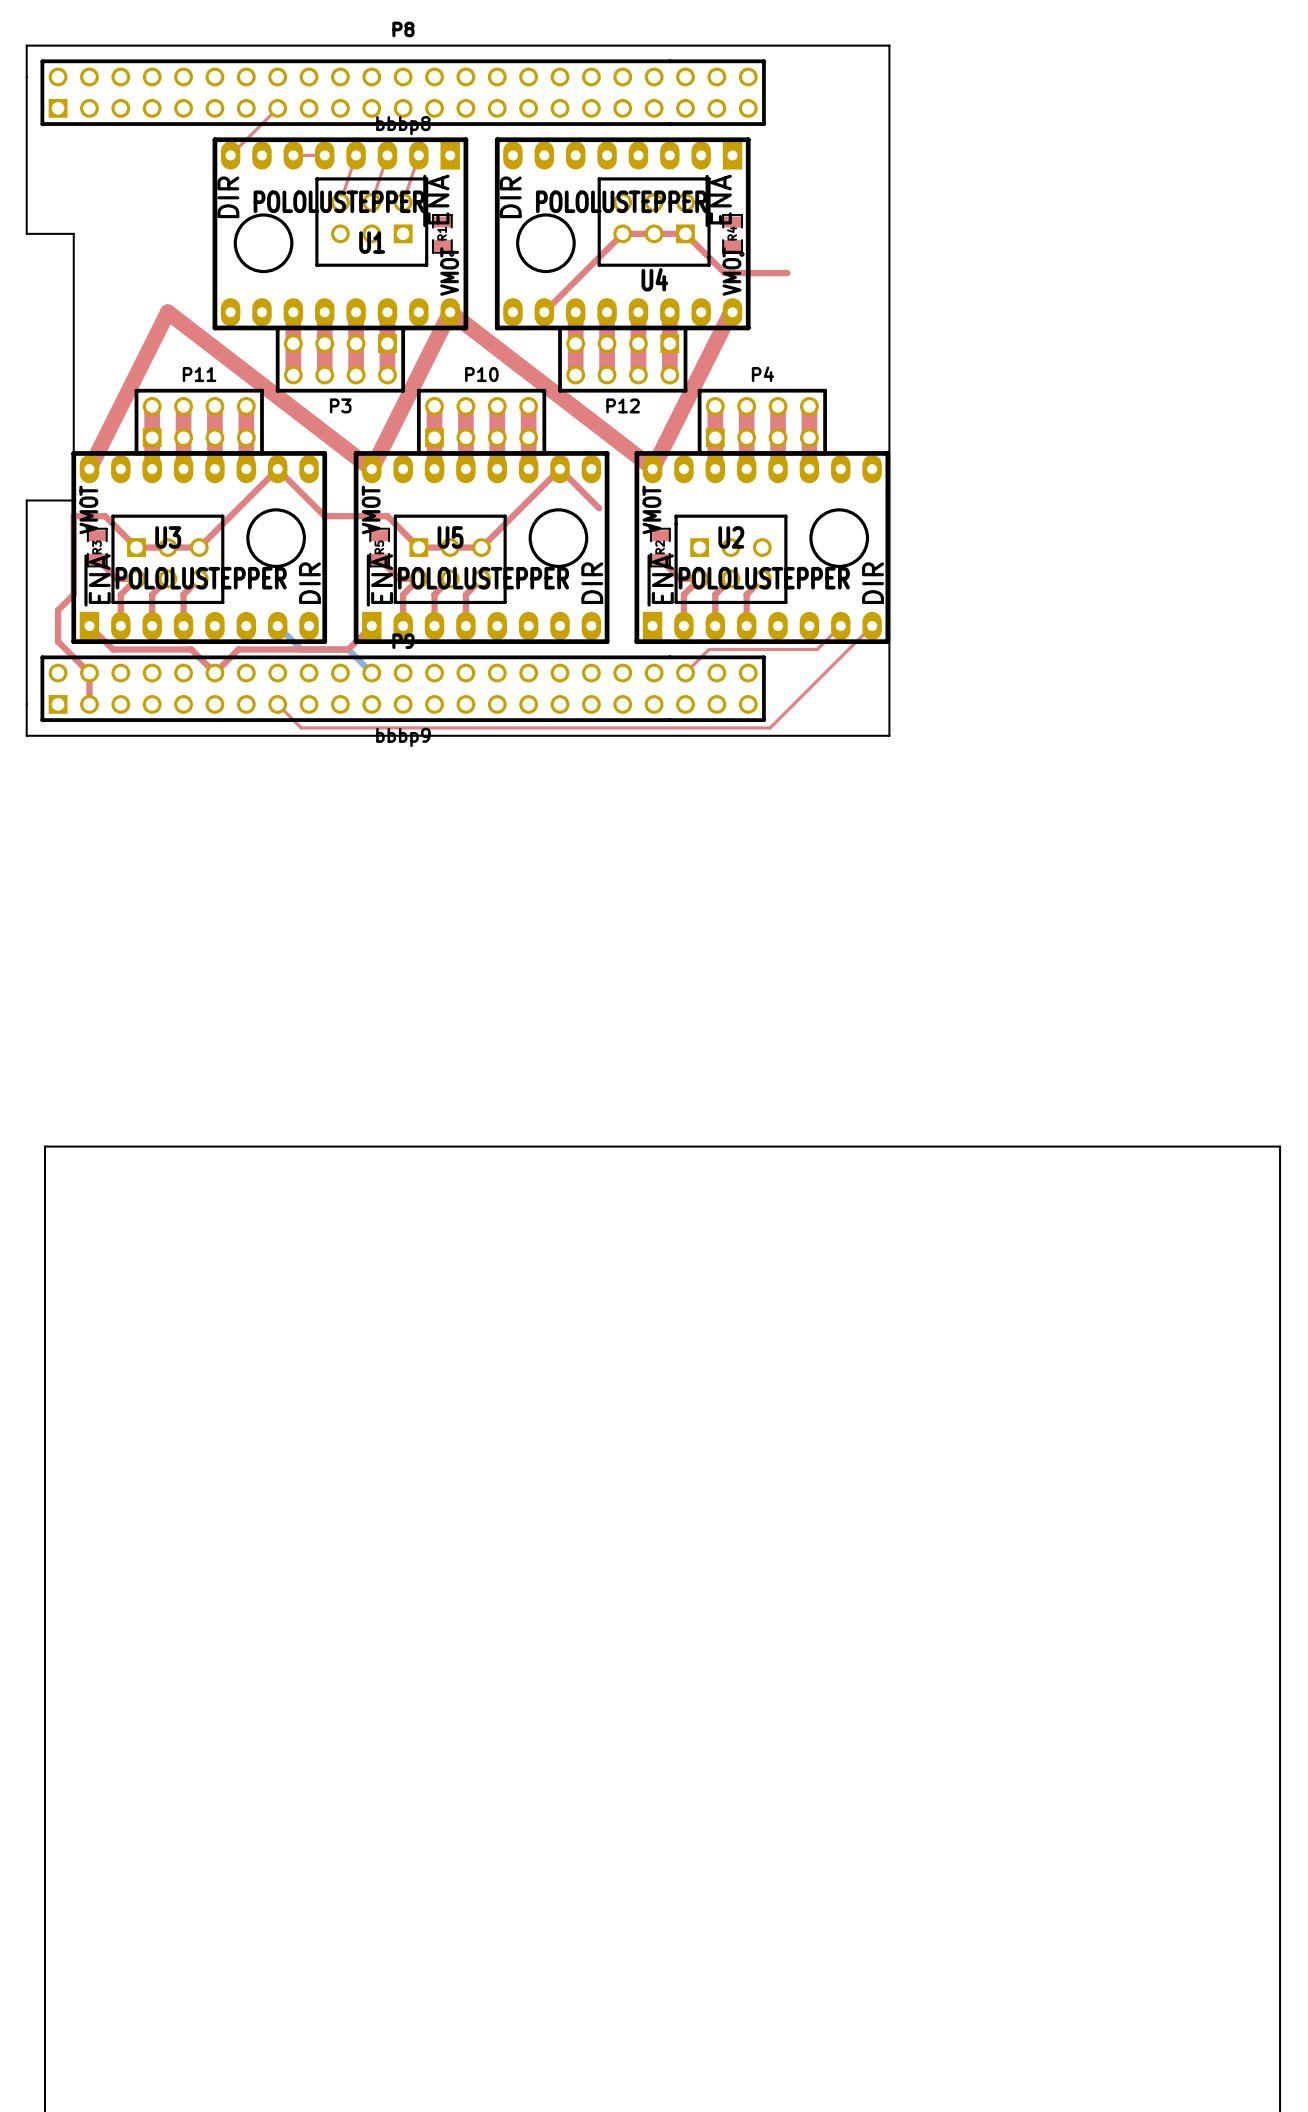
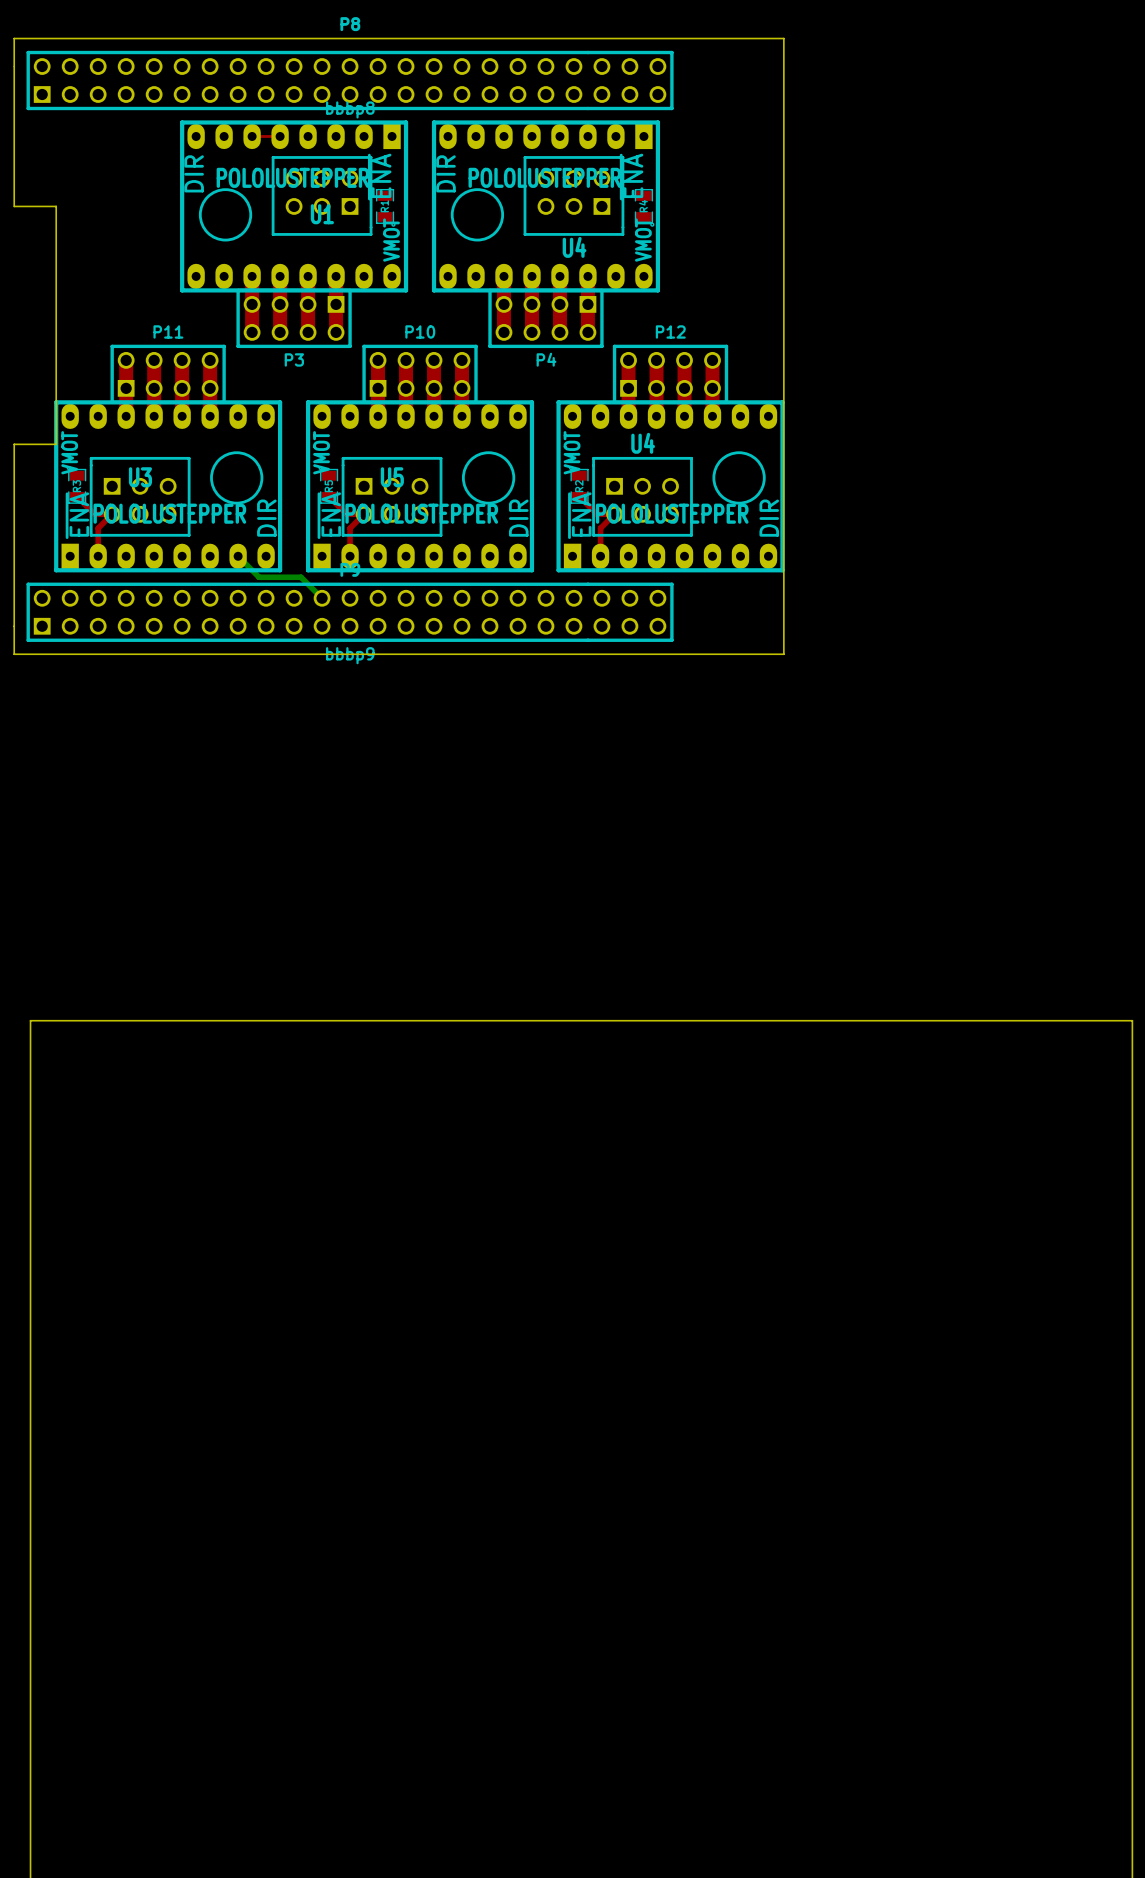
top track: (277, 108) (230, 155) -> none
top track: (356, 155) (340, 202) -> none
top track: (387, 155) (371, 202) -> none
top track: (418, 155) (403, 202) -> none
top track: (787, 273) (724, 273) (685, 233) (622, 233) (544, 312) -> none
top track: (730, 312) (652, 469) -> none
P4 name: P4 (762, 374) -> P12 (670, 331)
P12 name: P12 (623, 405) -> P4 (546, 359)
top track: (89, 469) (167, 312) (371, 469) (450, 312) (654, 469) -> none
top track: (599, 508) (560, 469) (481, 547) (418, 547) (387, 516) (324, 516) (277, 469) (199, 547) (136, 547) (105, 516) (73, 516) (73, 594) (58, 610) (58, 641) (89, 673) (89, 704) -> none
U2 name: U2 (731, 537) -> U4 (643, 443)
top track: (167, 578) (152, 594) (152, 625) -> none
top track: (199, 578) (183, 594) (183, 625) -> none
top track: (450, 578) (434, 594) (434, 625) -> none
top track: (481, 578) (465, 594) (465, 625) -> none
top track: (730, 578) (715, 594) (715, 625) -> none
top track: (762, 578) (746, 594) (746, 625) -> none
top track: (89, 625) (112, 649) (191, 649) (214, 673) (238, 649) (348, 649) (371, 625) -> none
top track: (840, 625) (817, 649) (709, 649) (685, 673) -> none
top track: (872, 625) (770, 727) (301, 727) (277, 704) -> none

